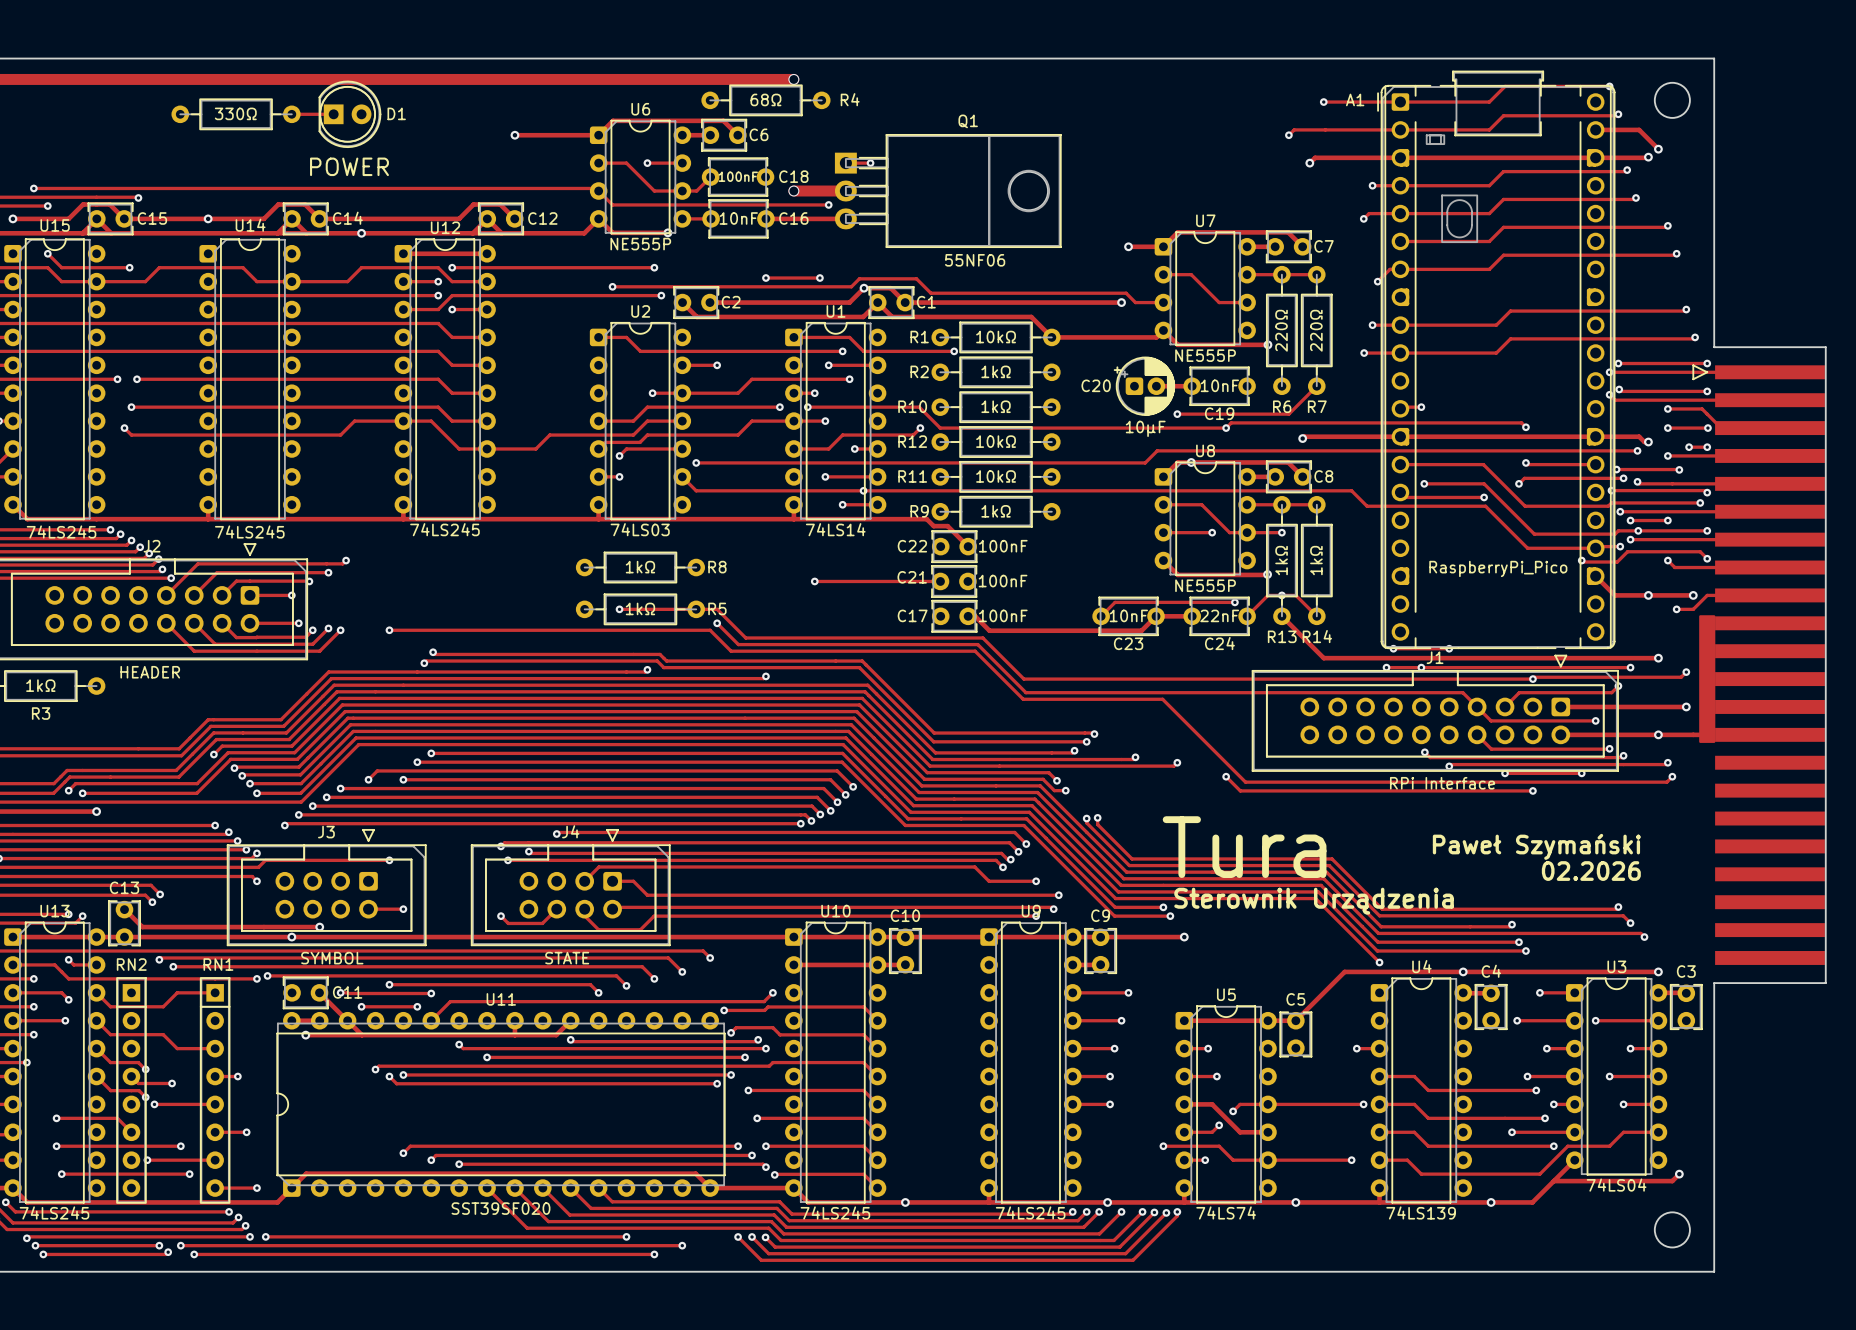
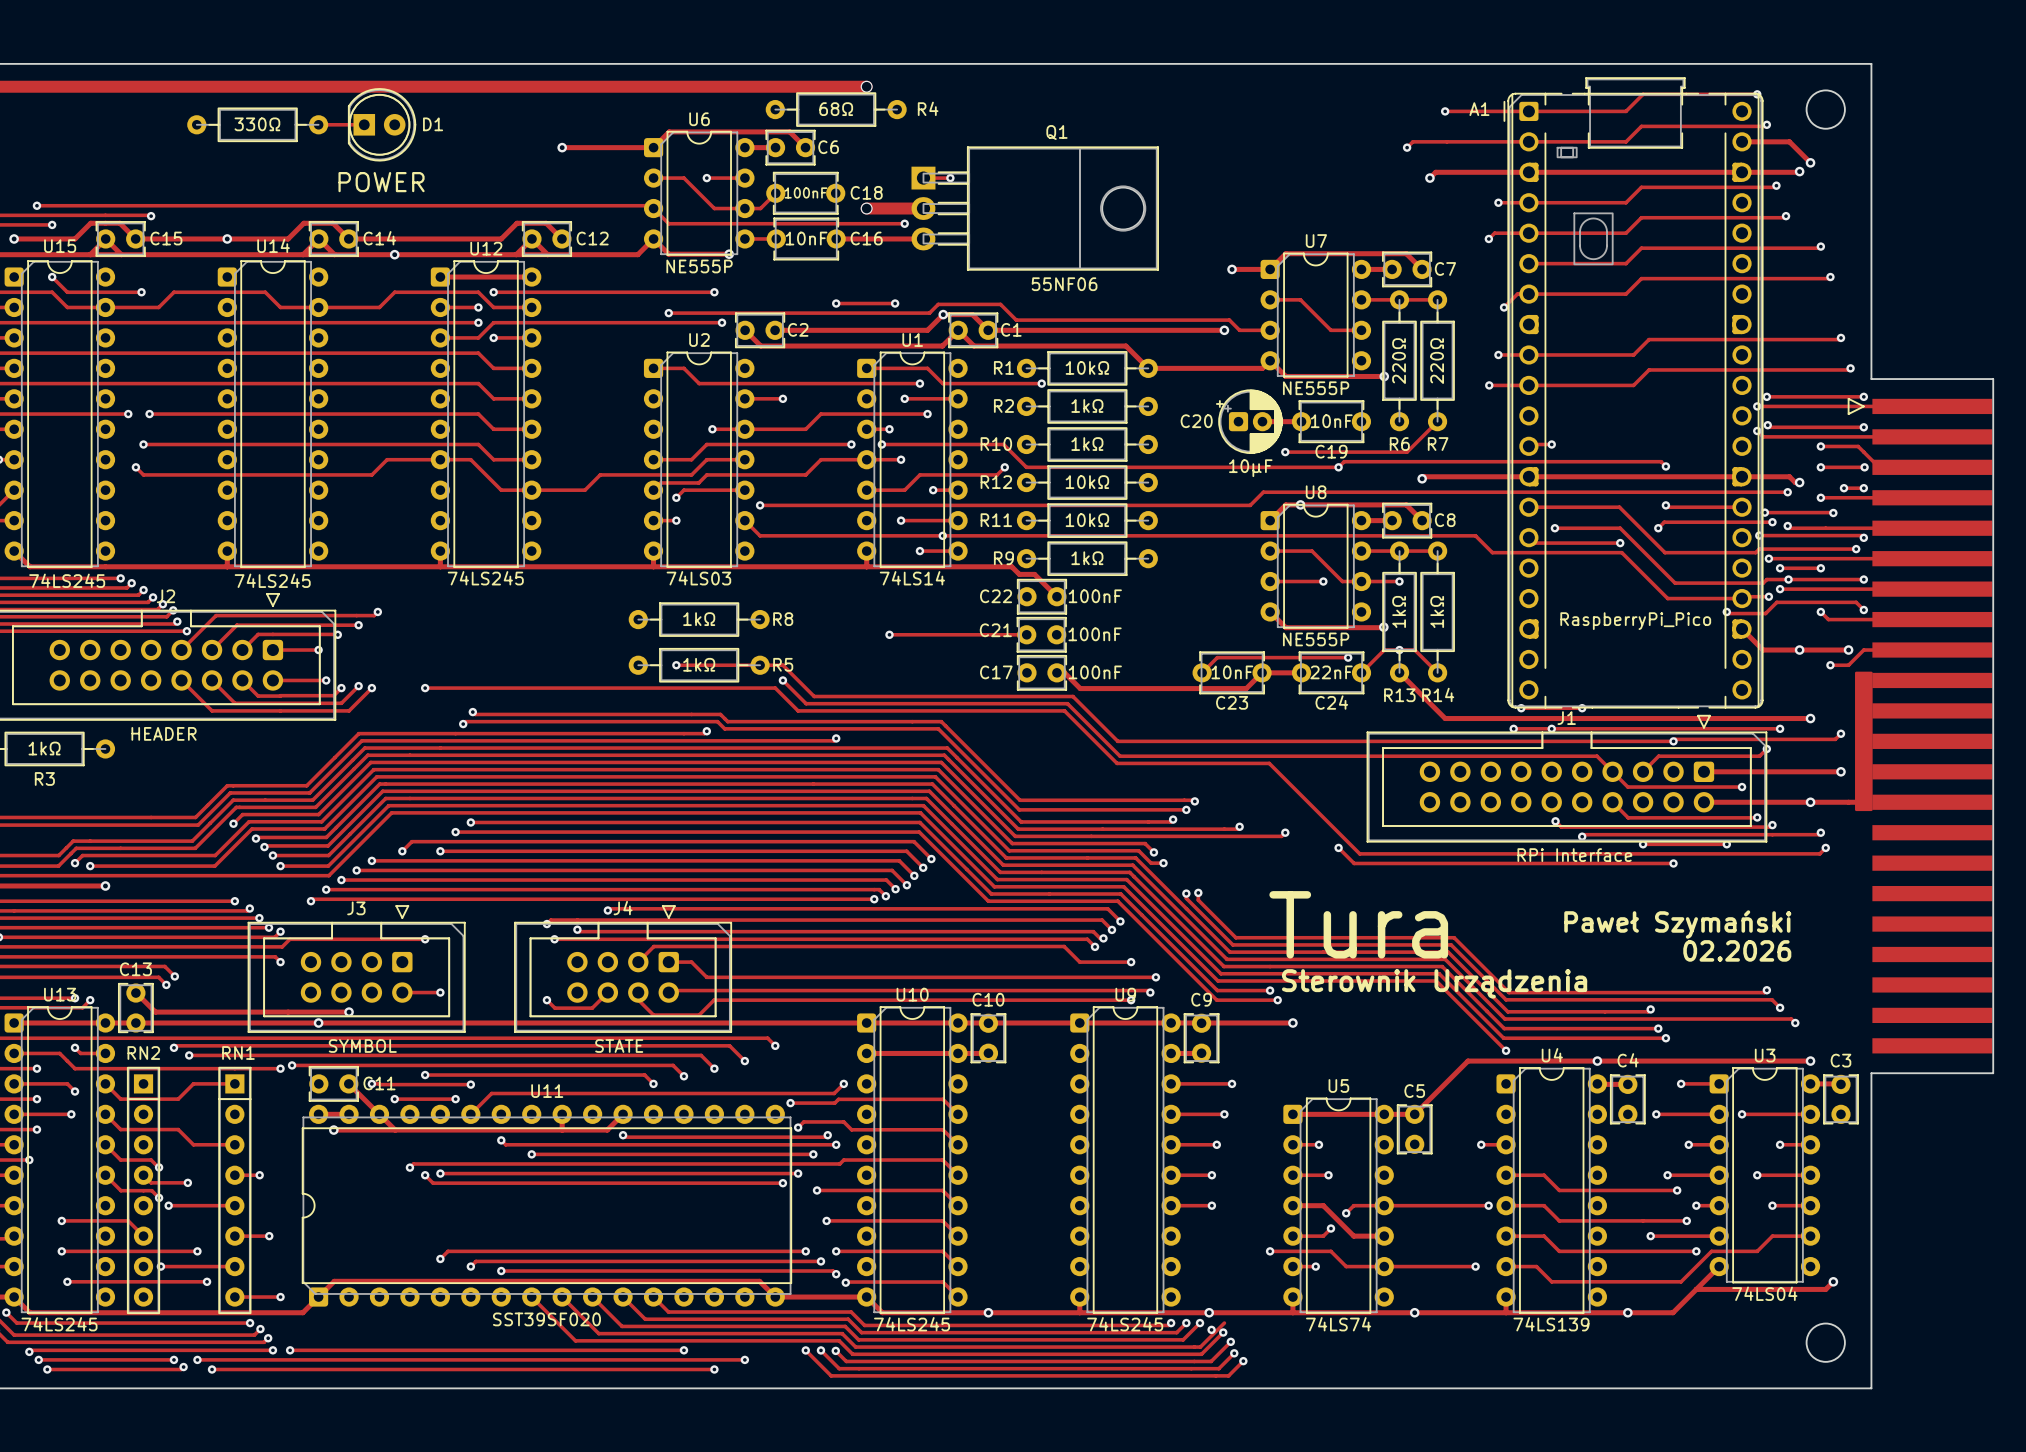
via: (1121, 1211) -> none
track: (1142, 1211) (1113, 1240) (1100, 1240) -> (1223, 1332) (1201, 1354)
via: (1142, 1211) -> none
track: (1177, 1211) (1177, 1215) (1132, 1260) (1125, 1260) -> (1243, 1361) (1228, 1375)
via: (1177, 1211) -> none
track: (1154, 1212) (1119, 1247) (1109, 1247) -> (1230, 1341) (1211, 1361)
via: (1154, 1212) -> none
track: (1166, 1212) (1125, 1253) (1116, 1253) -> (1234, 1353) (1218, 1368)
via: (1166, 1212) -> none
via: none -> (1211, 1329)
via: none -> (1223, 1332)
via: none -> (1230, 1341)
via: none -> (1234, 1353)
via: none -> (1243, 1361)

